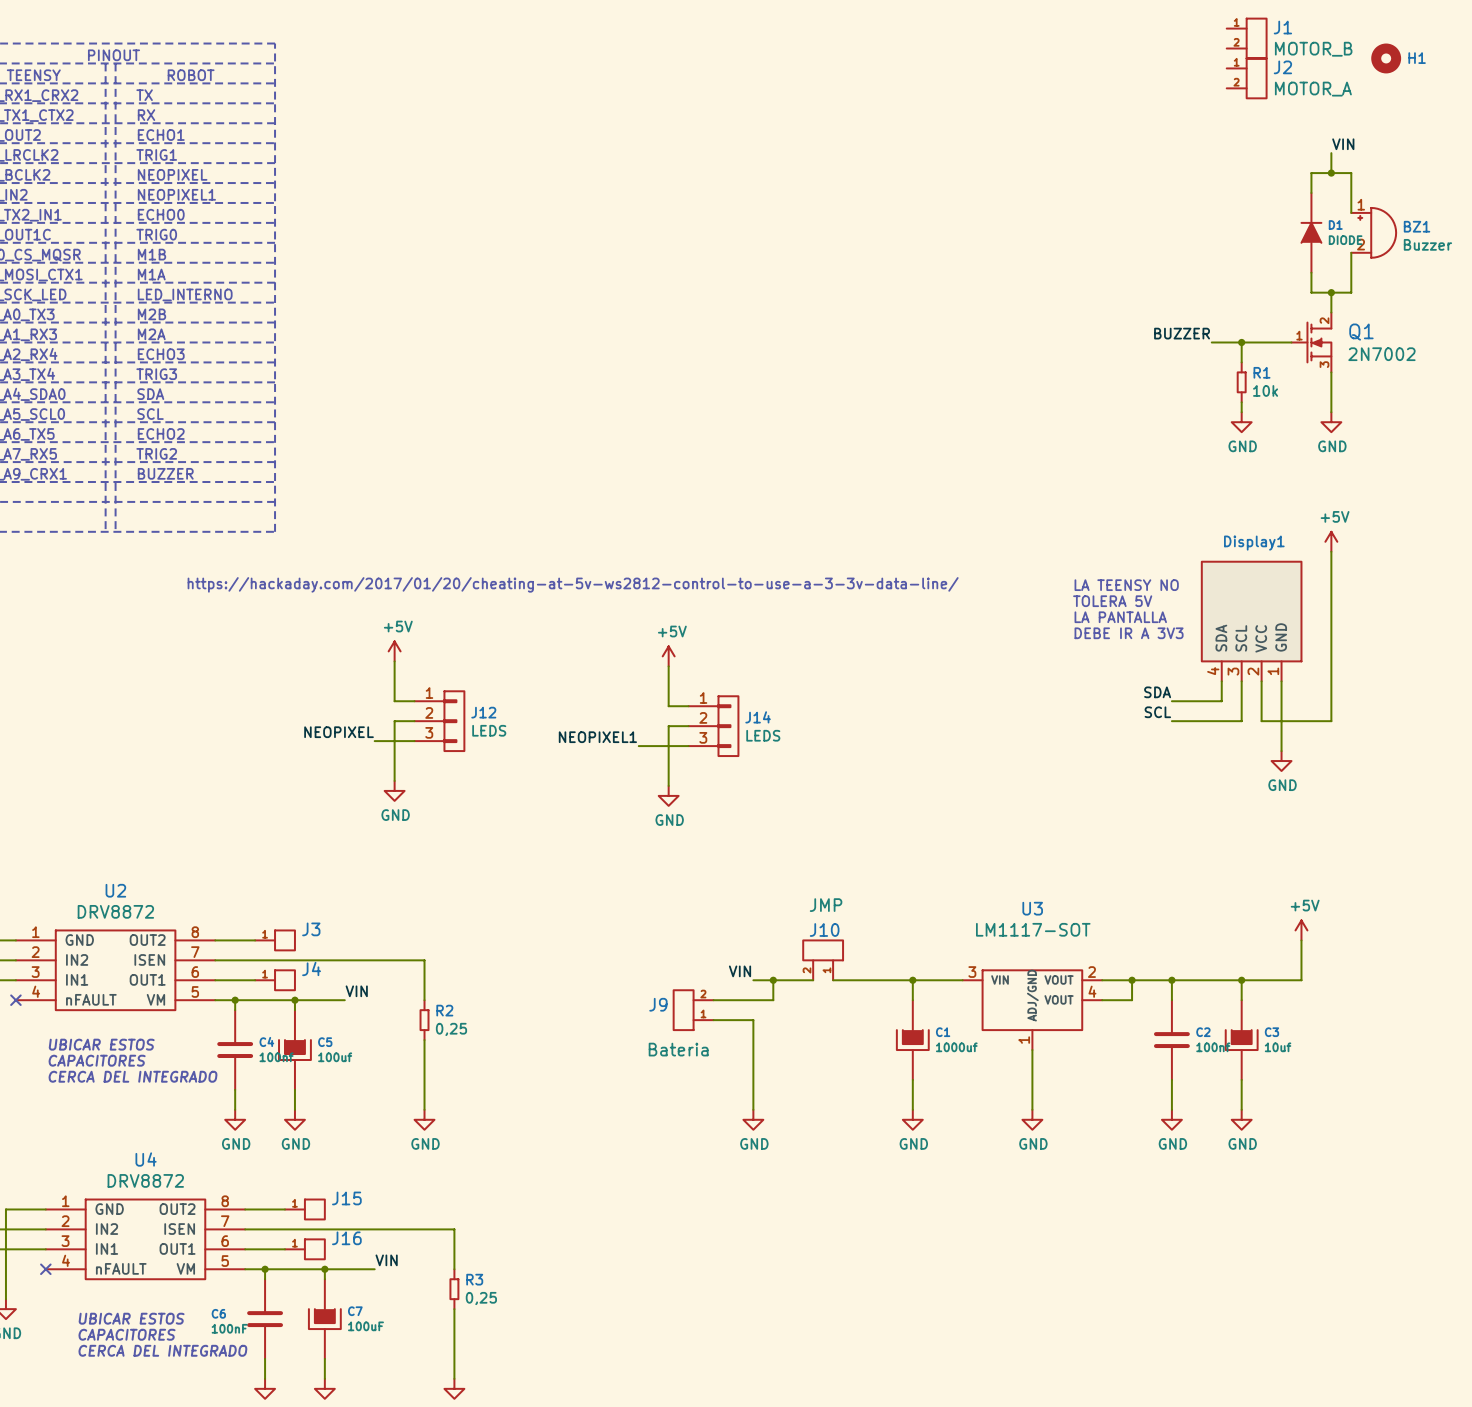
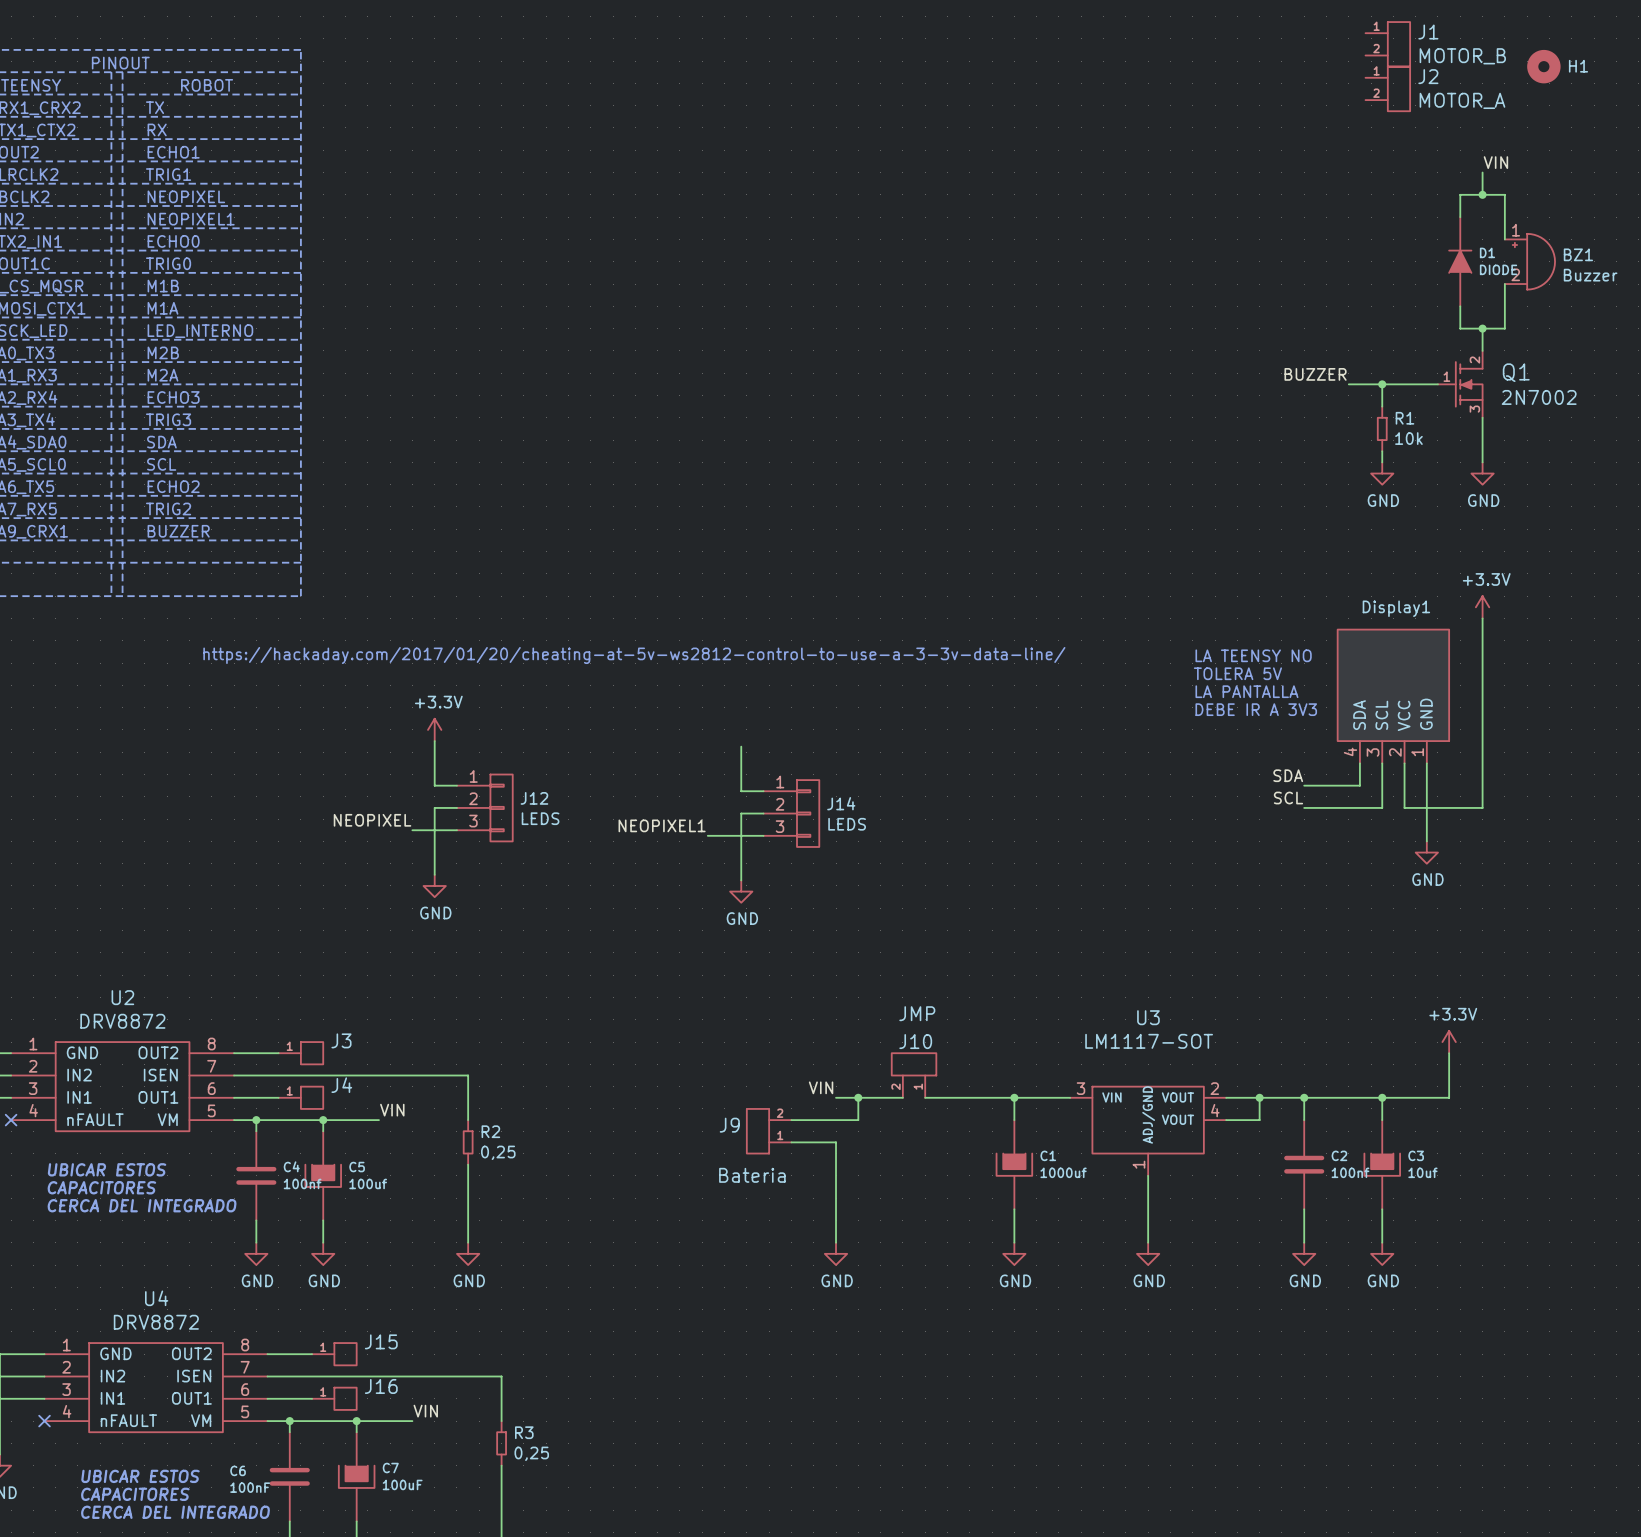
power symbol: +5V (1331, 541) -> +3.3V (1482, 607)
power symbol: +5V (394, 651) -> +3.3V (434, 729)
power symbol: +5V (668, 656) -> none
power symbol: +5V (1301, 930) -> +3.3V (1449, 1042)

